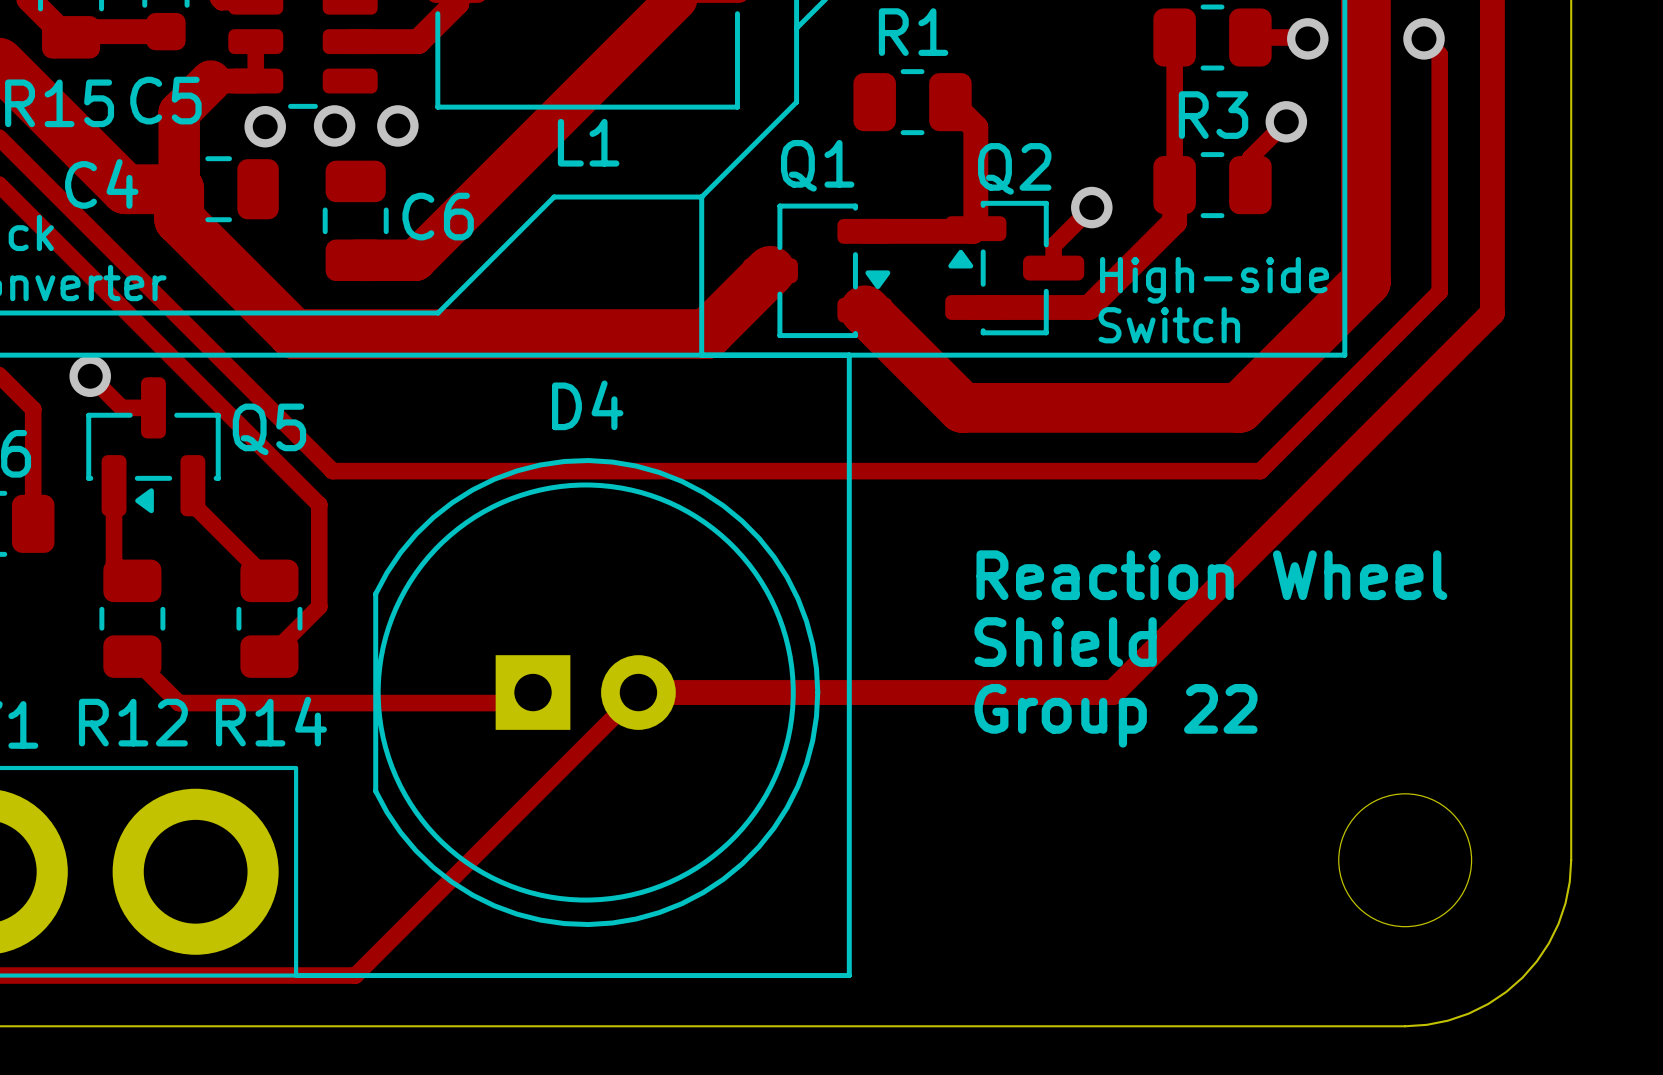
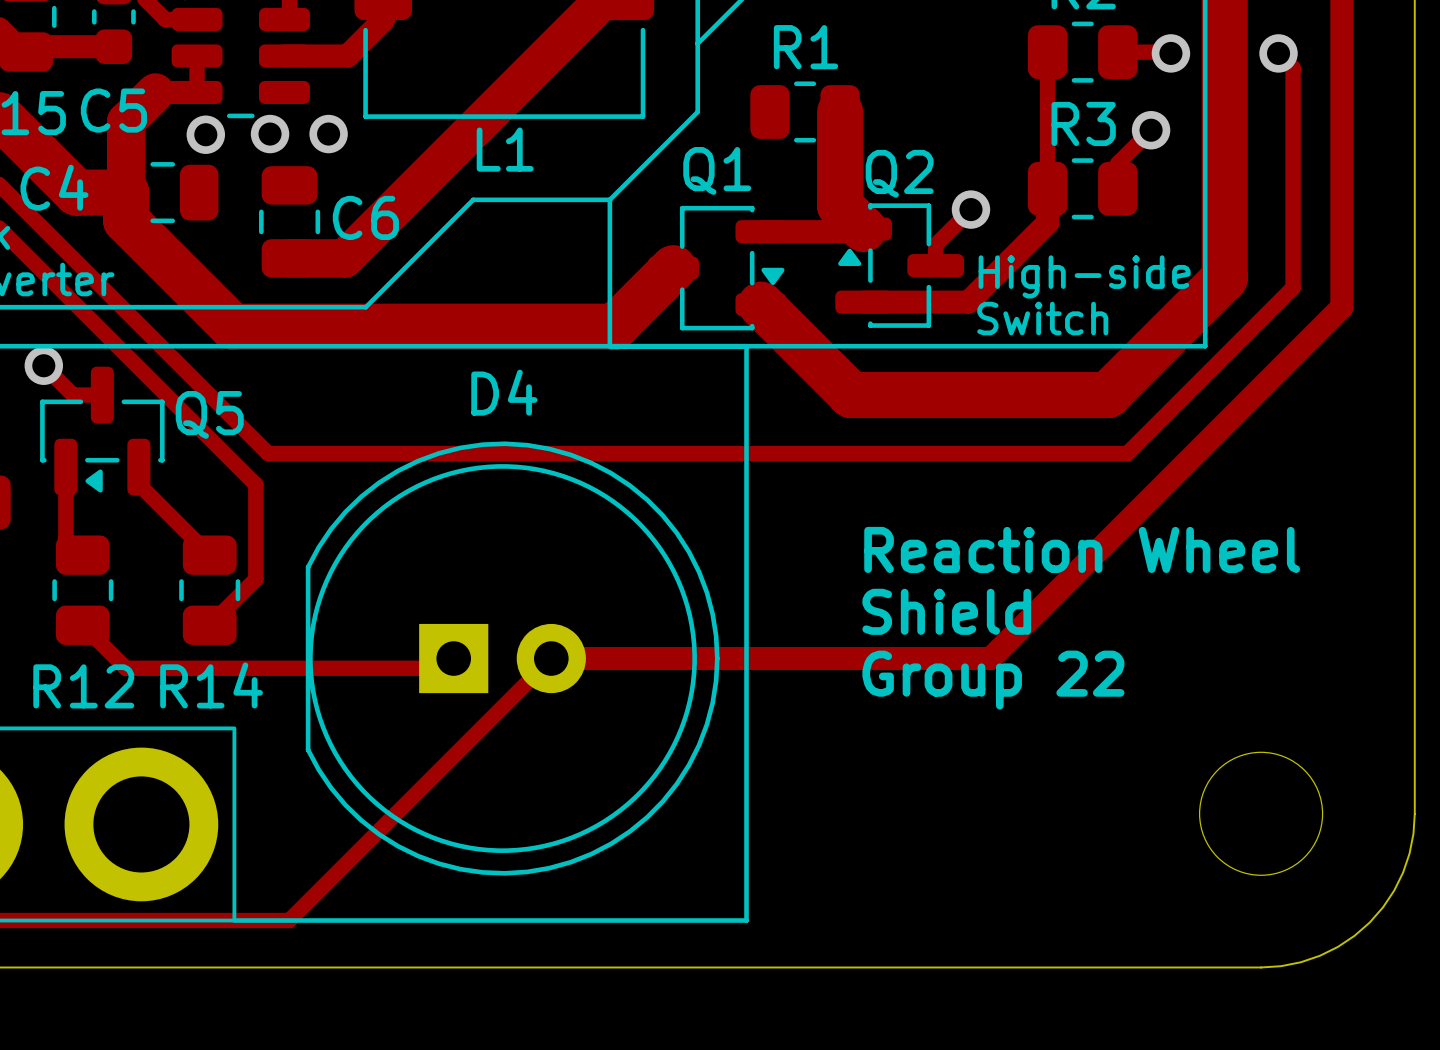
track: (950, 102) (975, 127) (975, 228) -> (840, 111) (840, 205) (863, 229)

